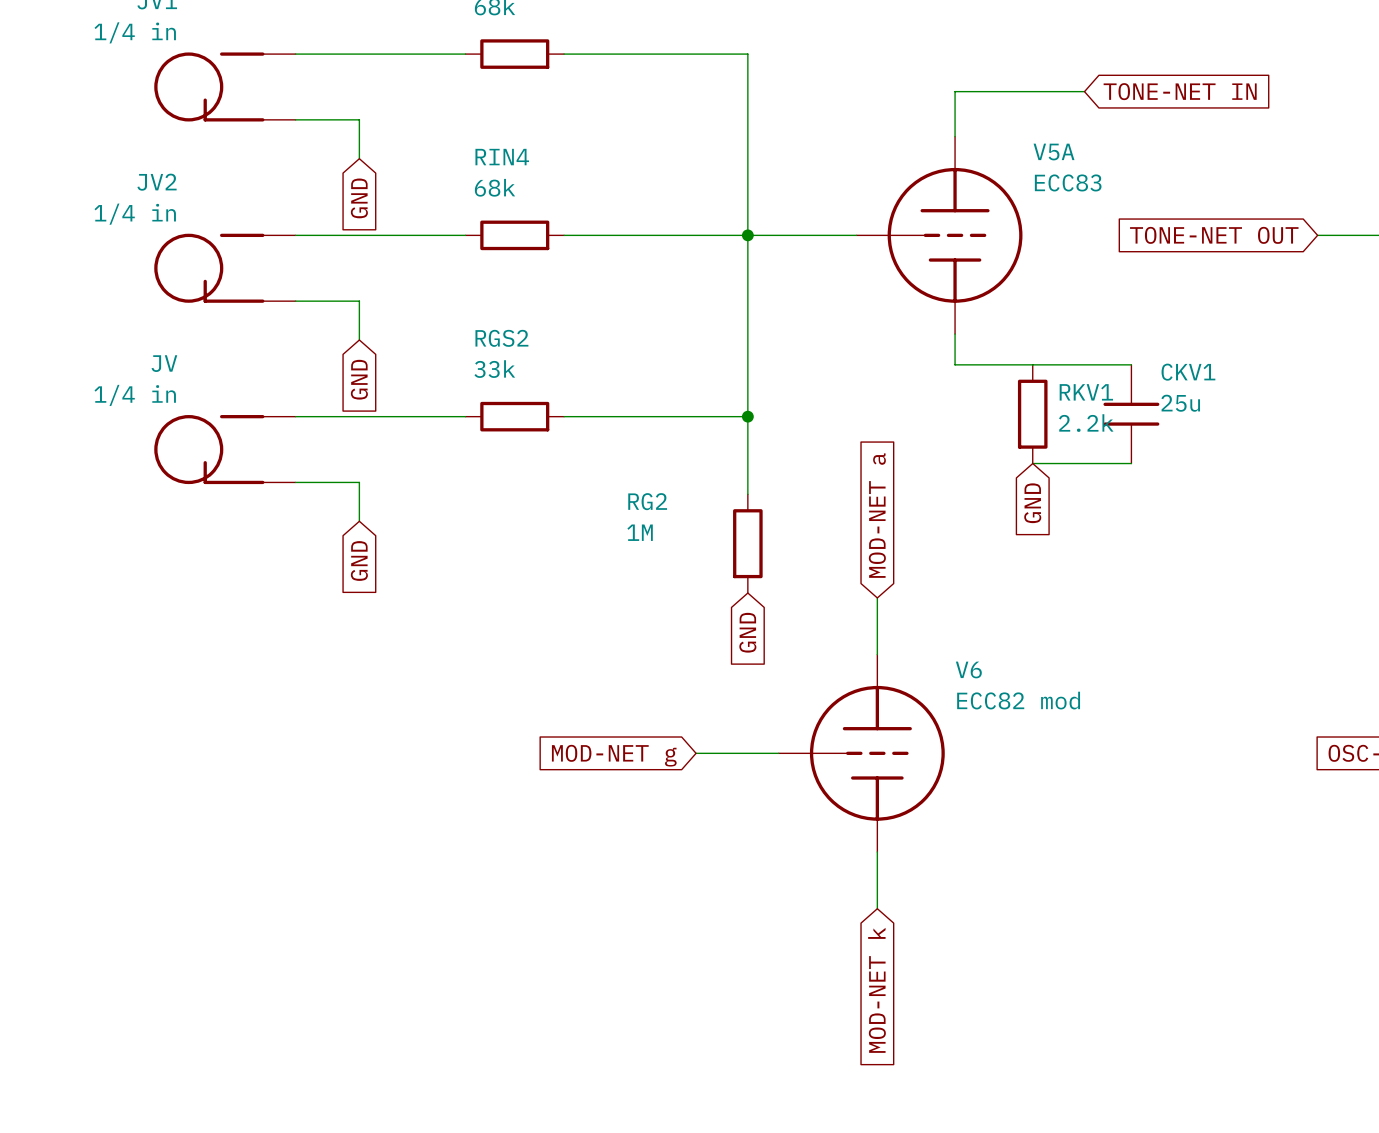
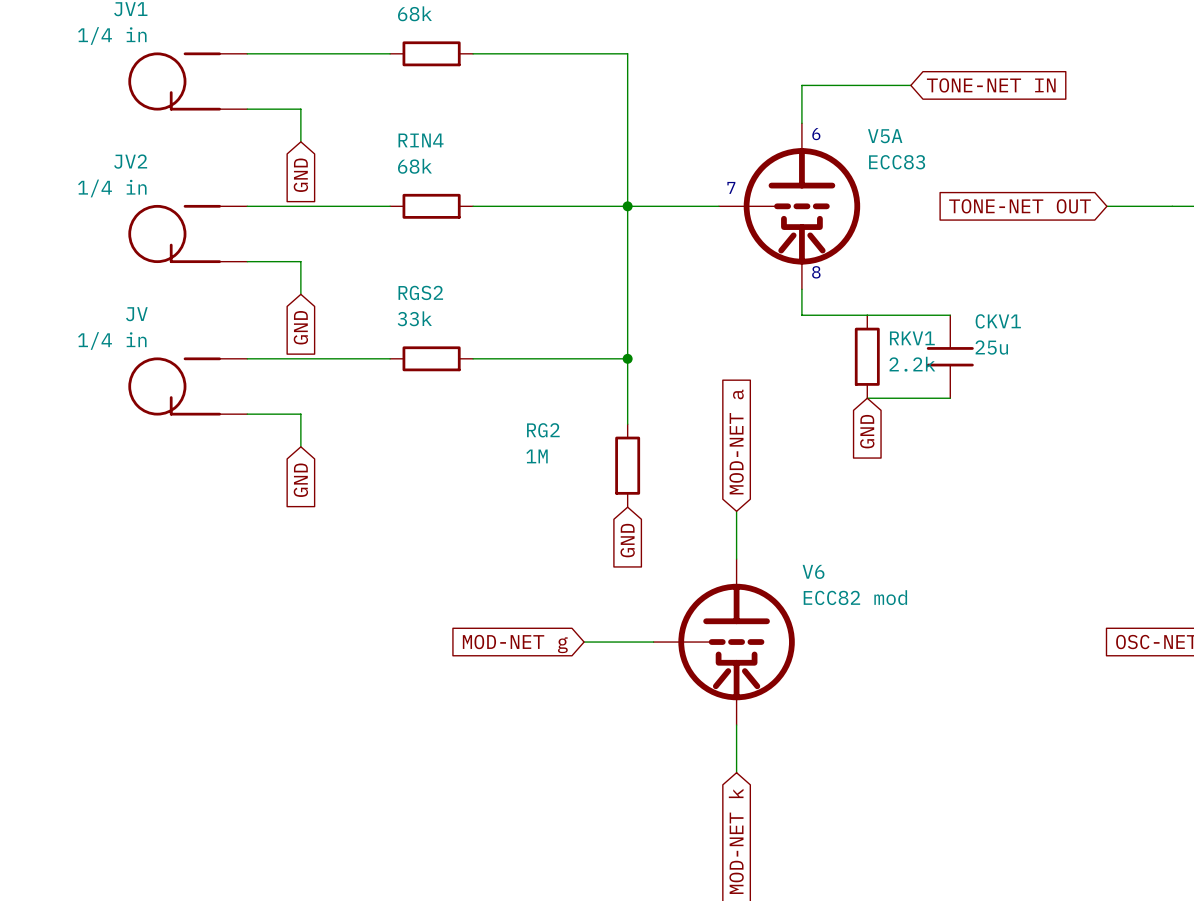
V5A symbol: [856, 136, 1023, 335] -> [718, 123, 861, 290]
text: none -> 6 (816, 134)
text: none -> 7 (731, 187)
text: none -> 8 (816, 272)
V6 symbol: [778, 654, 945, 853] -> [653, 559, 795, 726]

